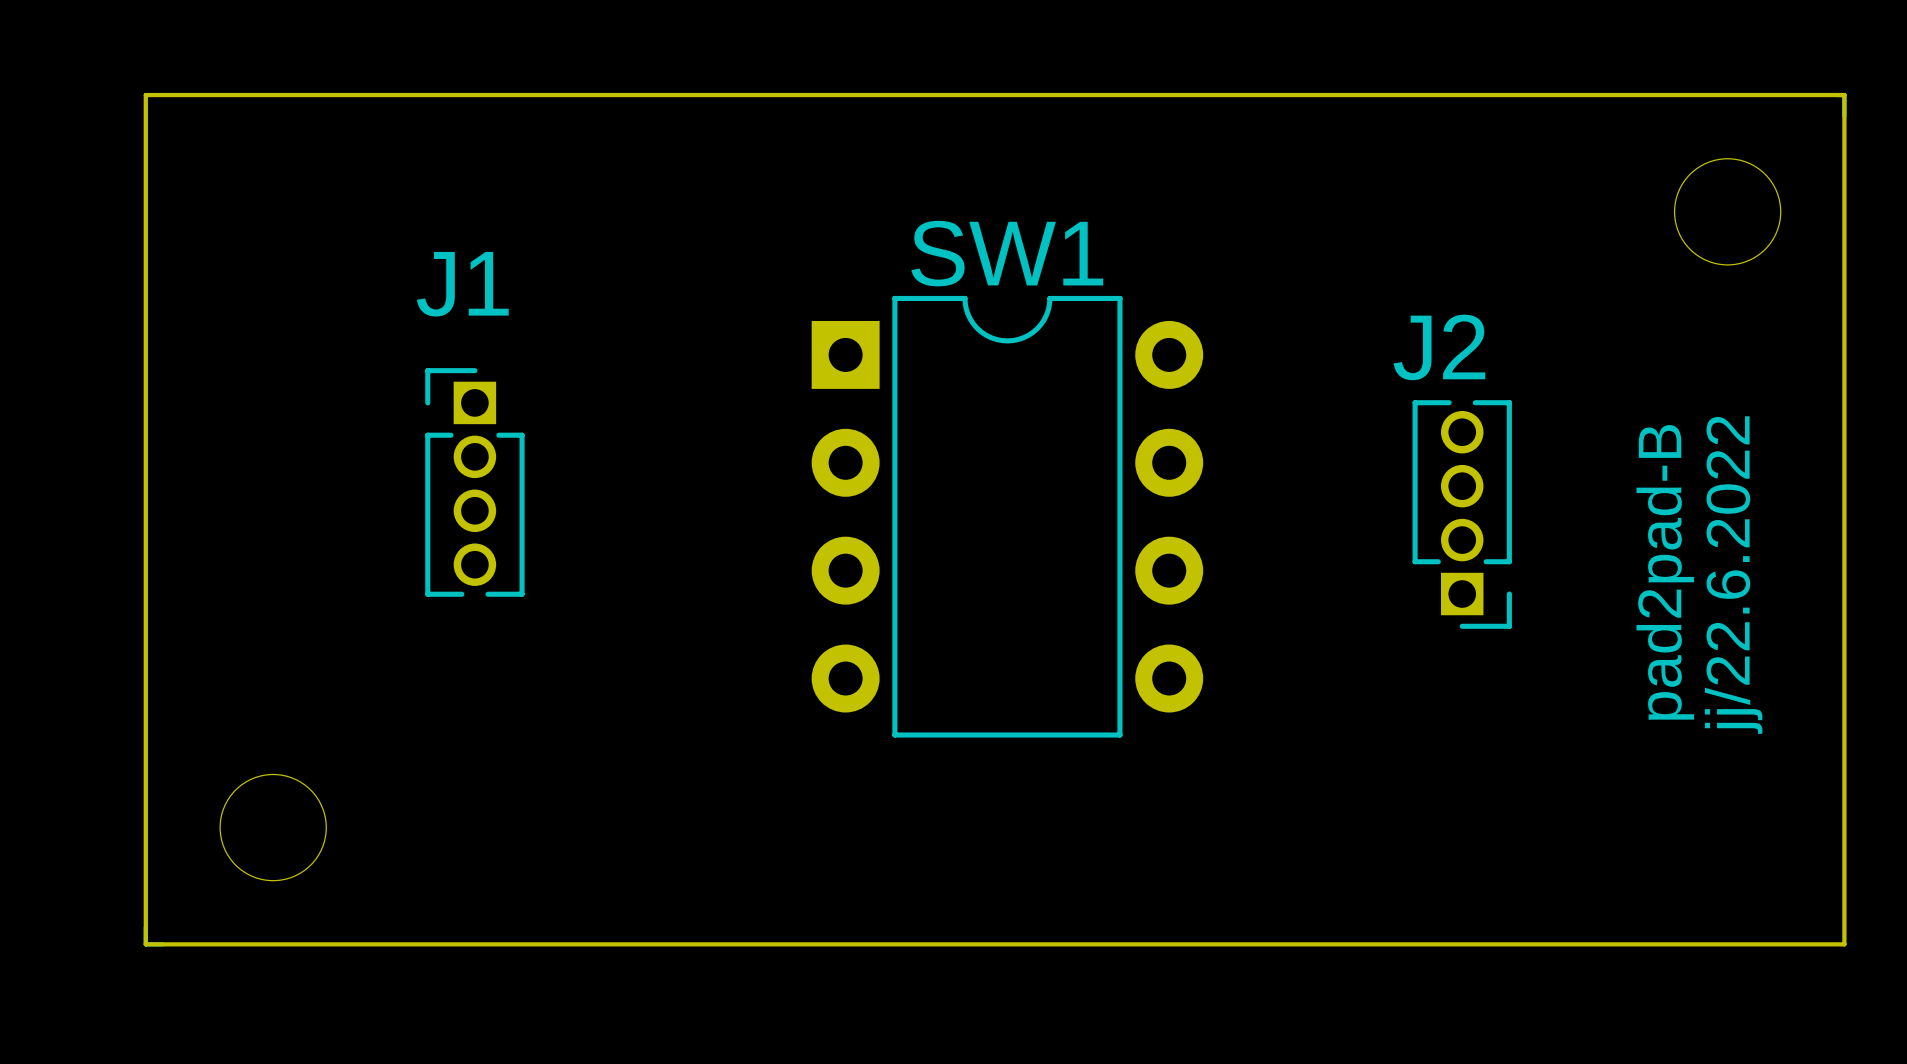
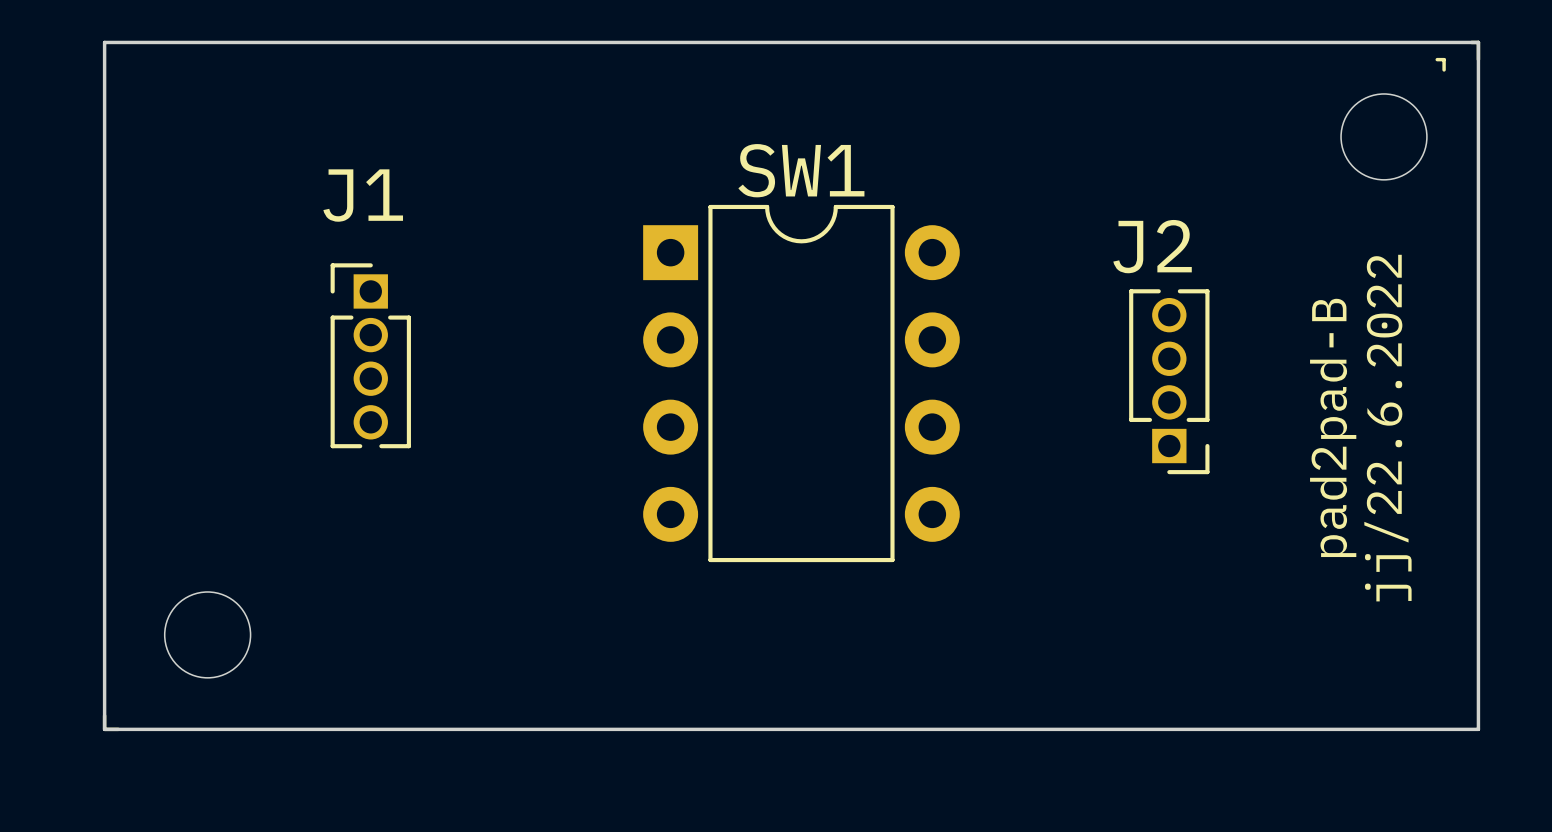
line: none -> (1437, 59) (1444, 59) (1444, 69)

